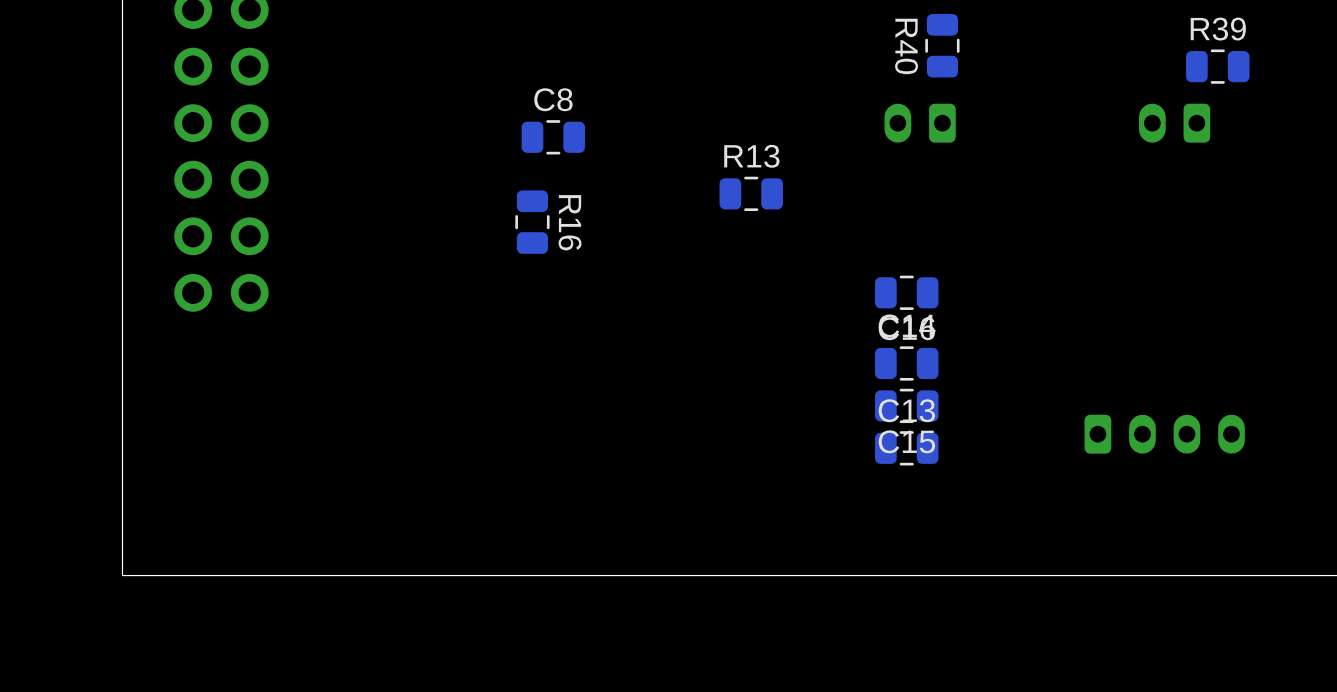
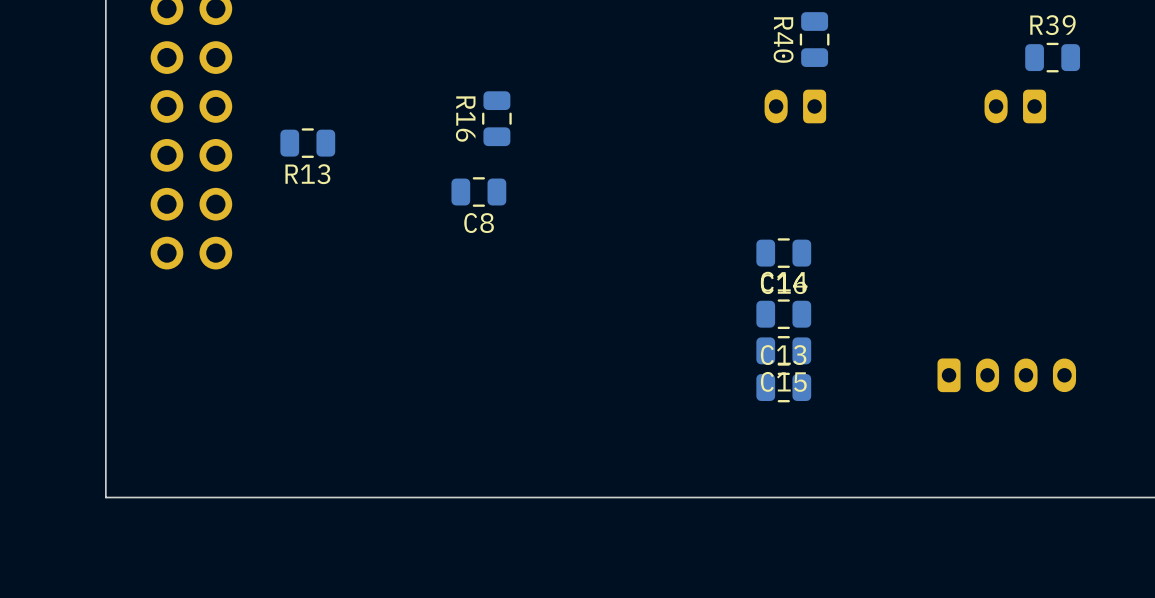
C8 name position: C8 (553, 99) -> C8 (479, 223)
C8 position: (553, 137) -> (478, 192)
R13 name position: R13 (751, 156) -> R13 (307, 174)
R13 position: (751, 193) -> (307, 143)
R16 position: (532, 222) -> (496, 118)
R16 name position: R16 (570, 222) -> R16 (465, 119)

